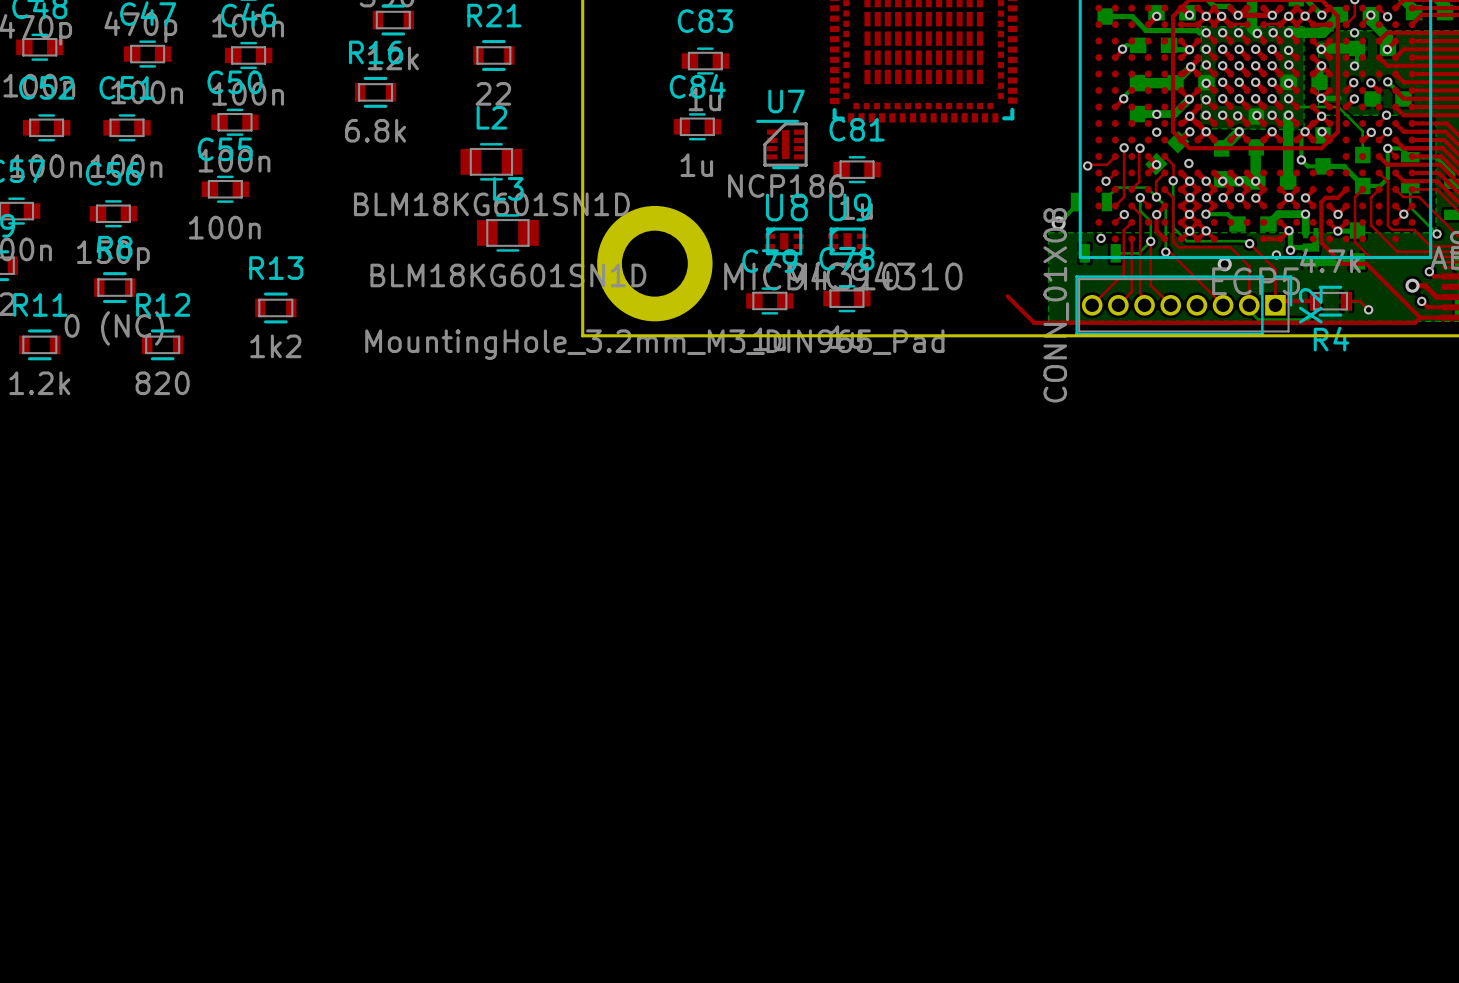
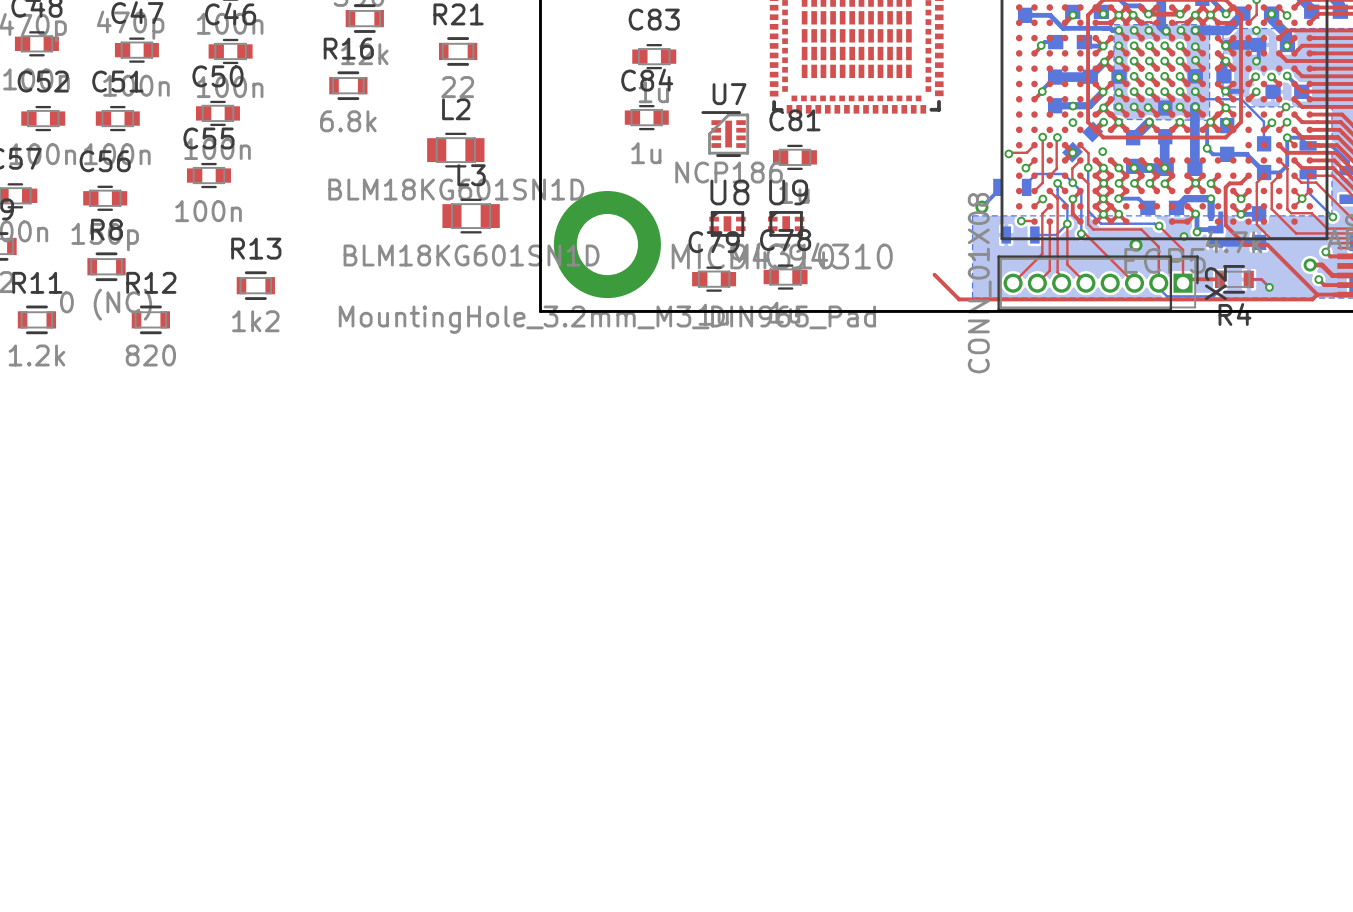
top track: none -> (1021, 221) (1034, 221)

